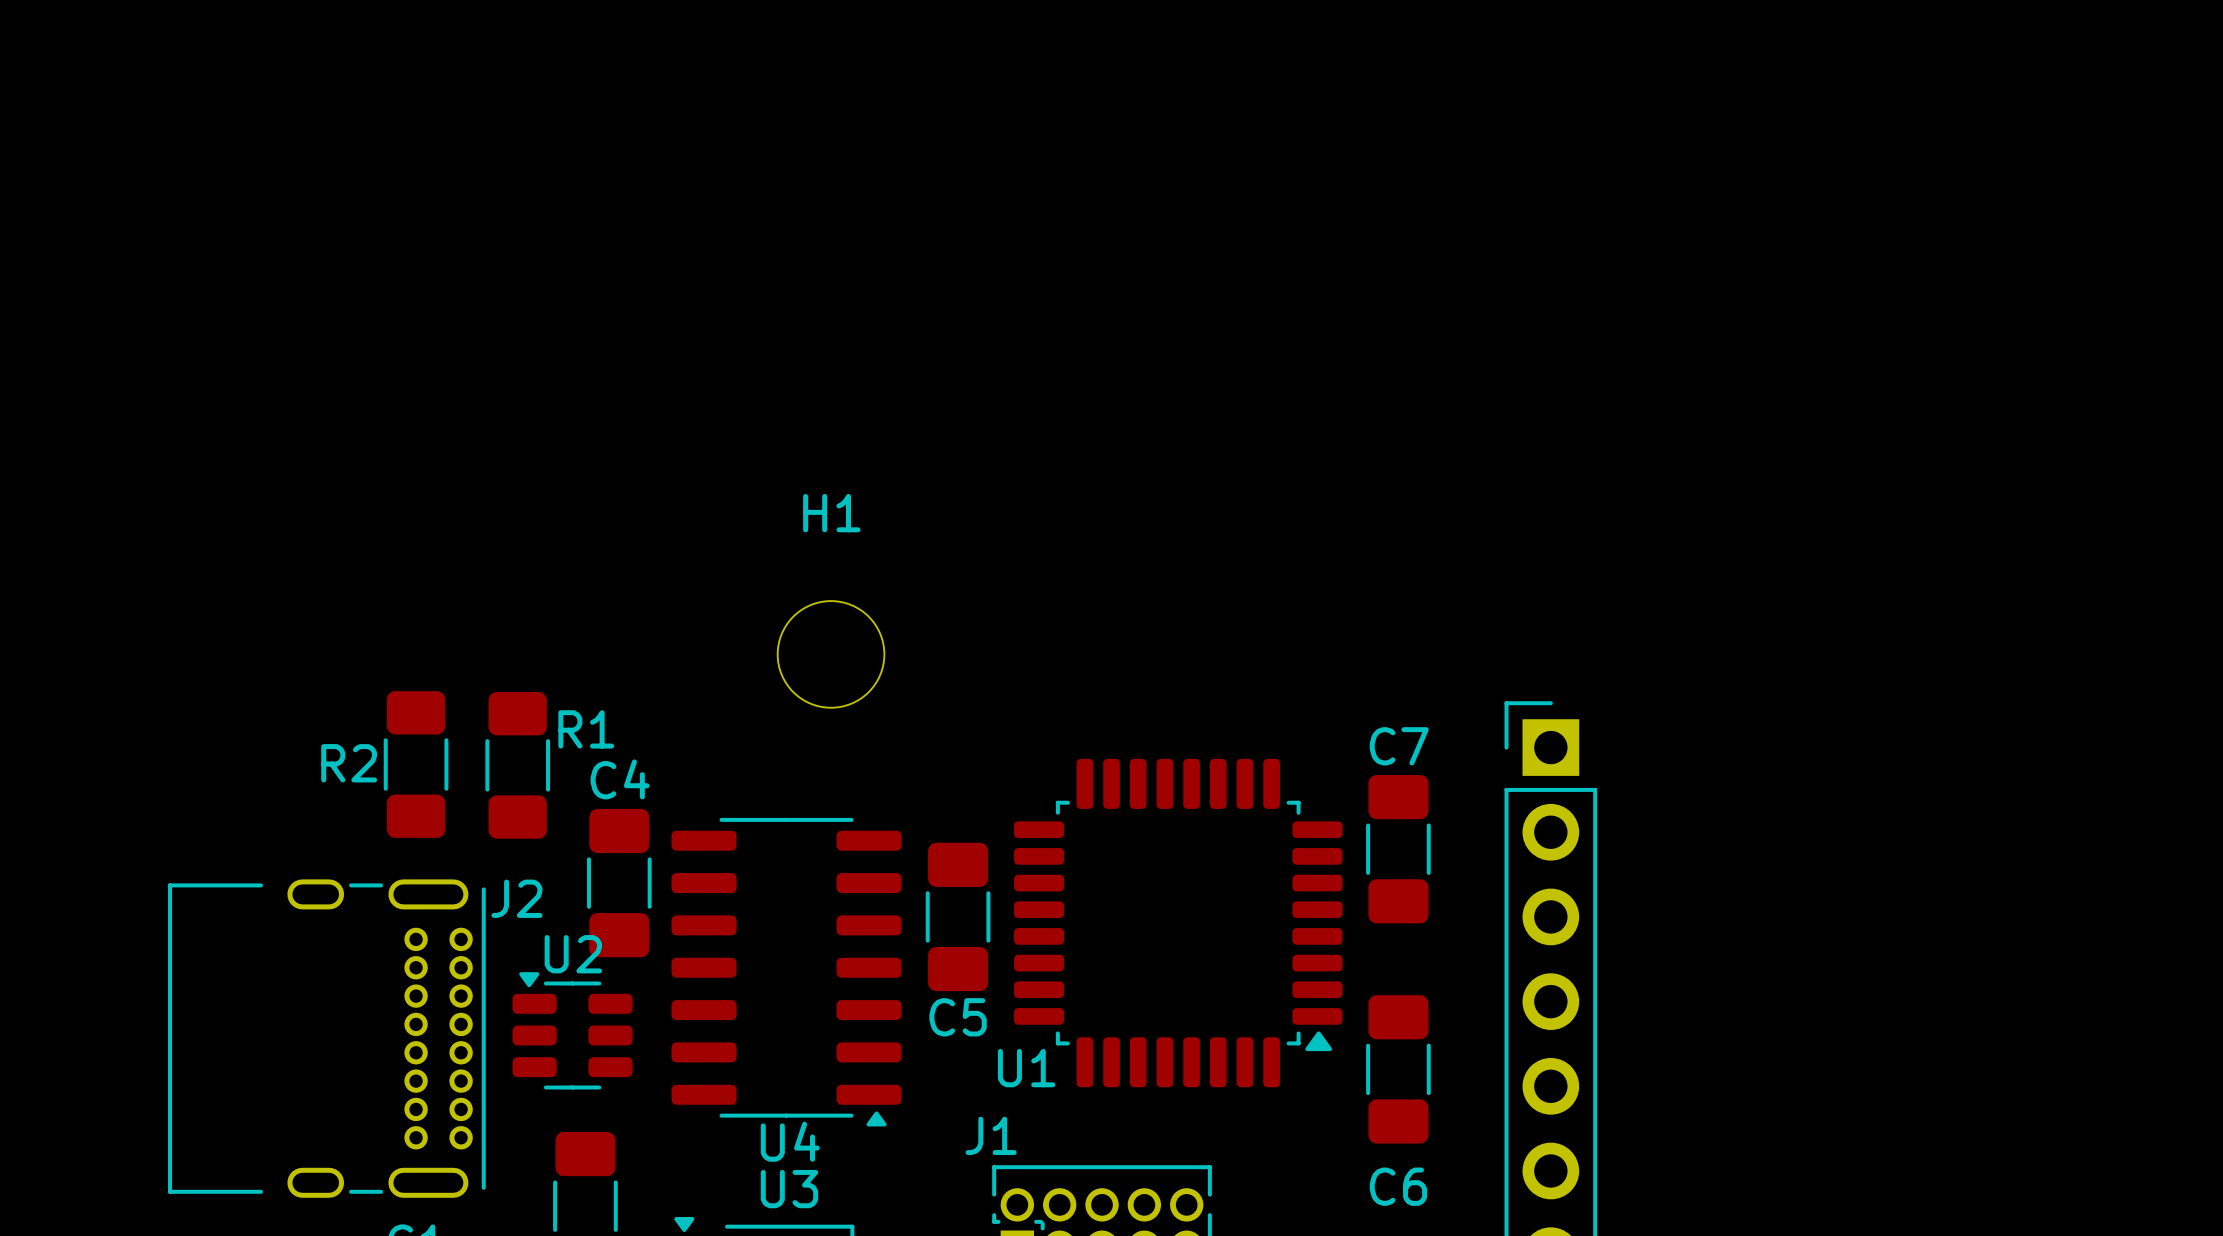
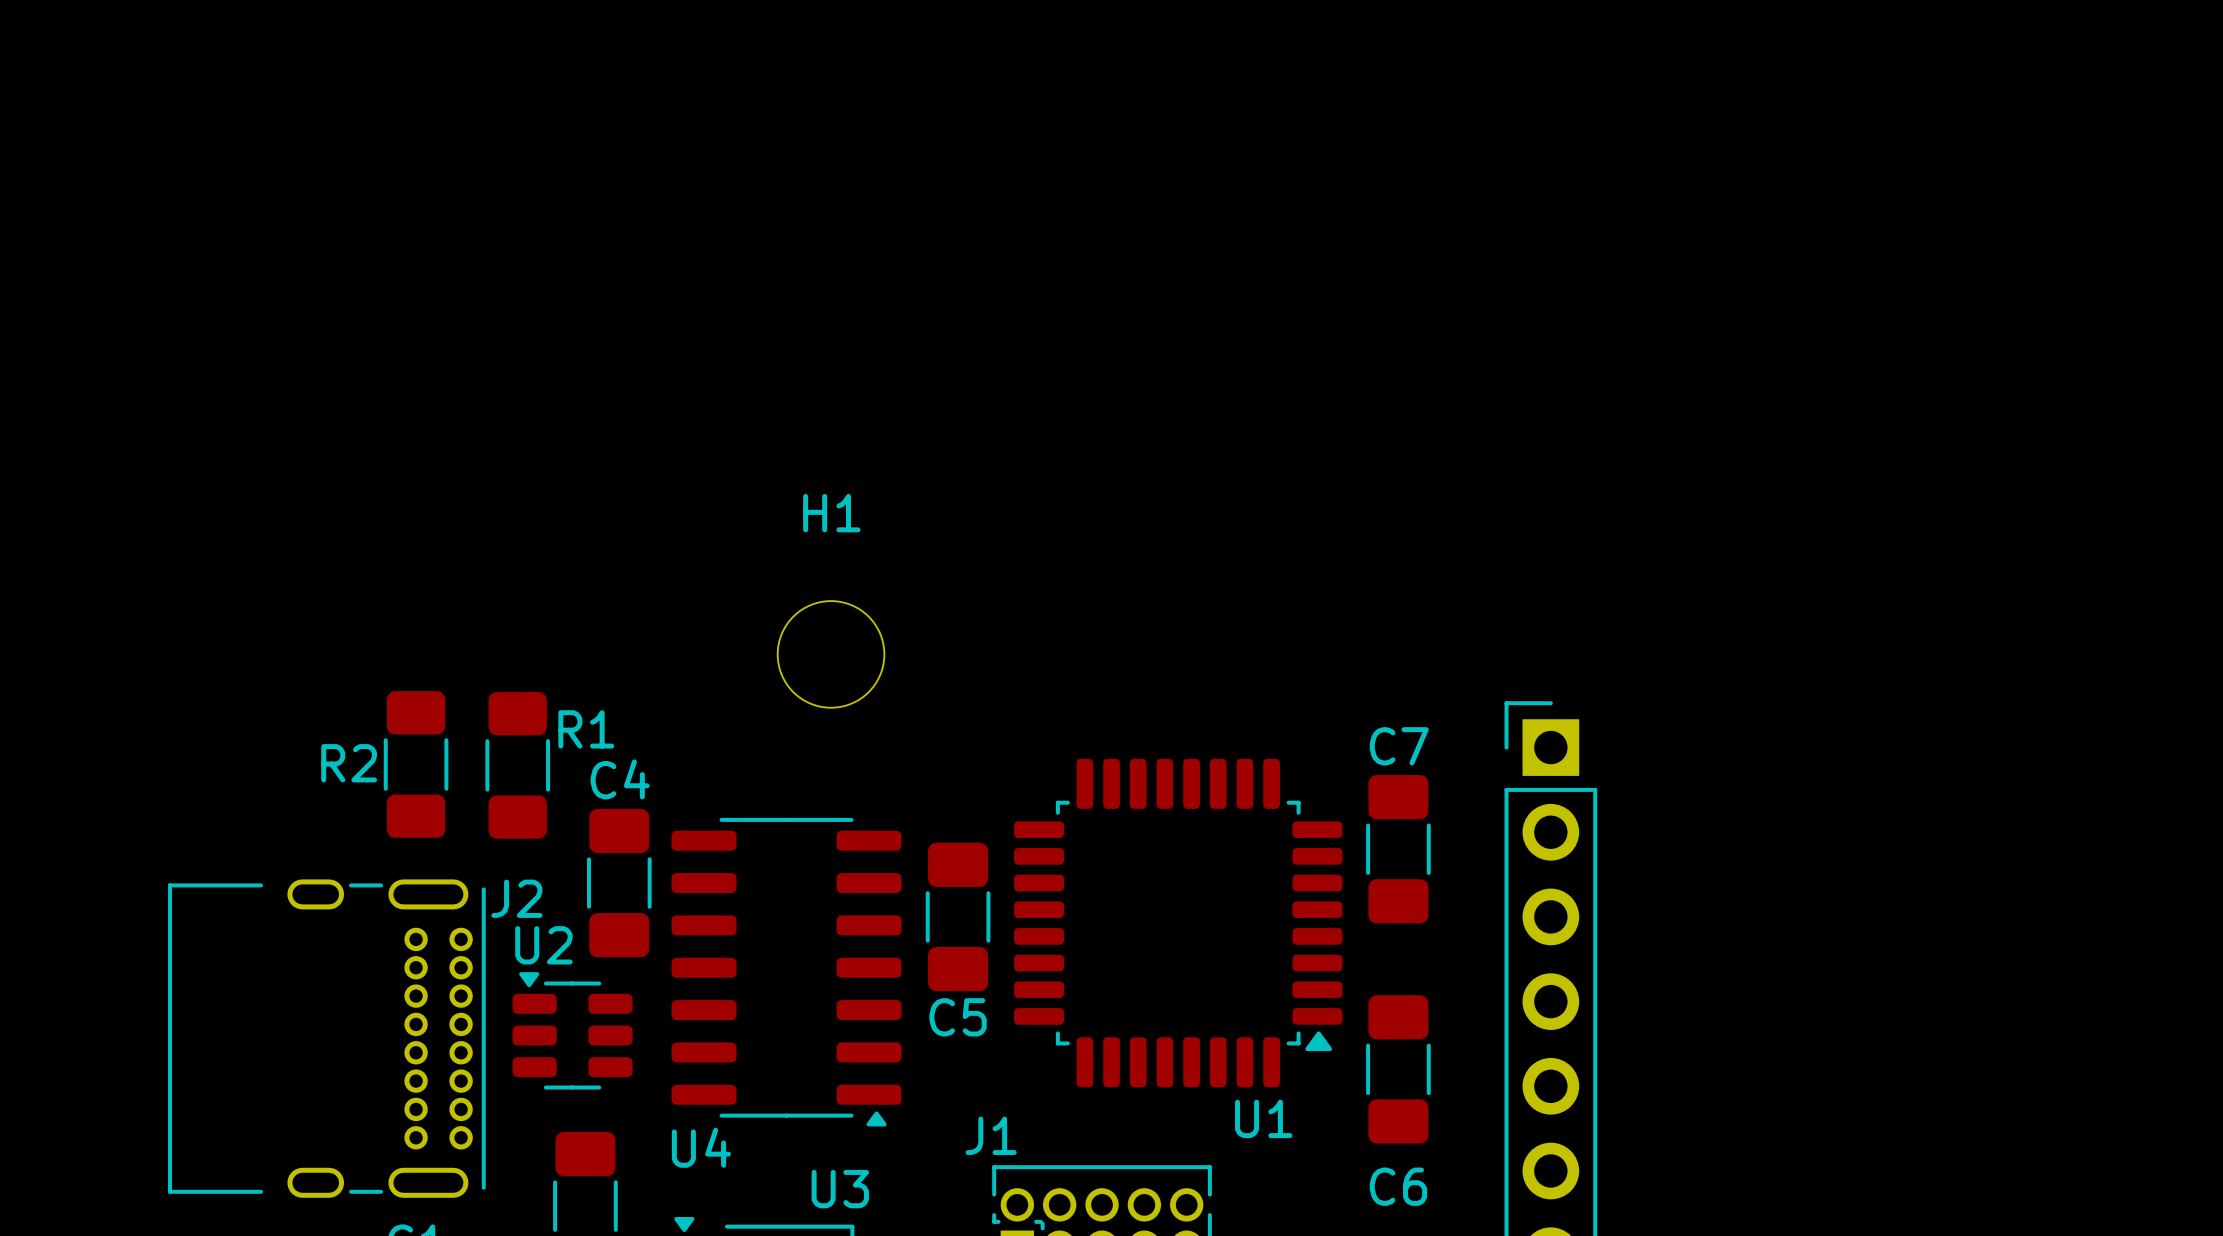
U2 name position: U2 (573, 954) -> U2 (543, 945)
U1 name position: U1 (1026, 1068) -> U1 (1263, 1118)
U4 name position: U4 (790, 1141) -> U4 (701, 1147)
U3 name position: U3 (789, 1189) -> U3 (840, 1189)

